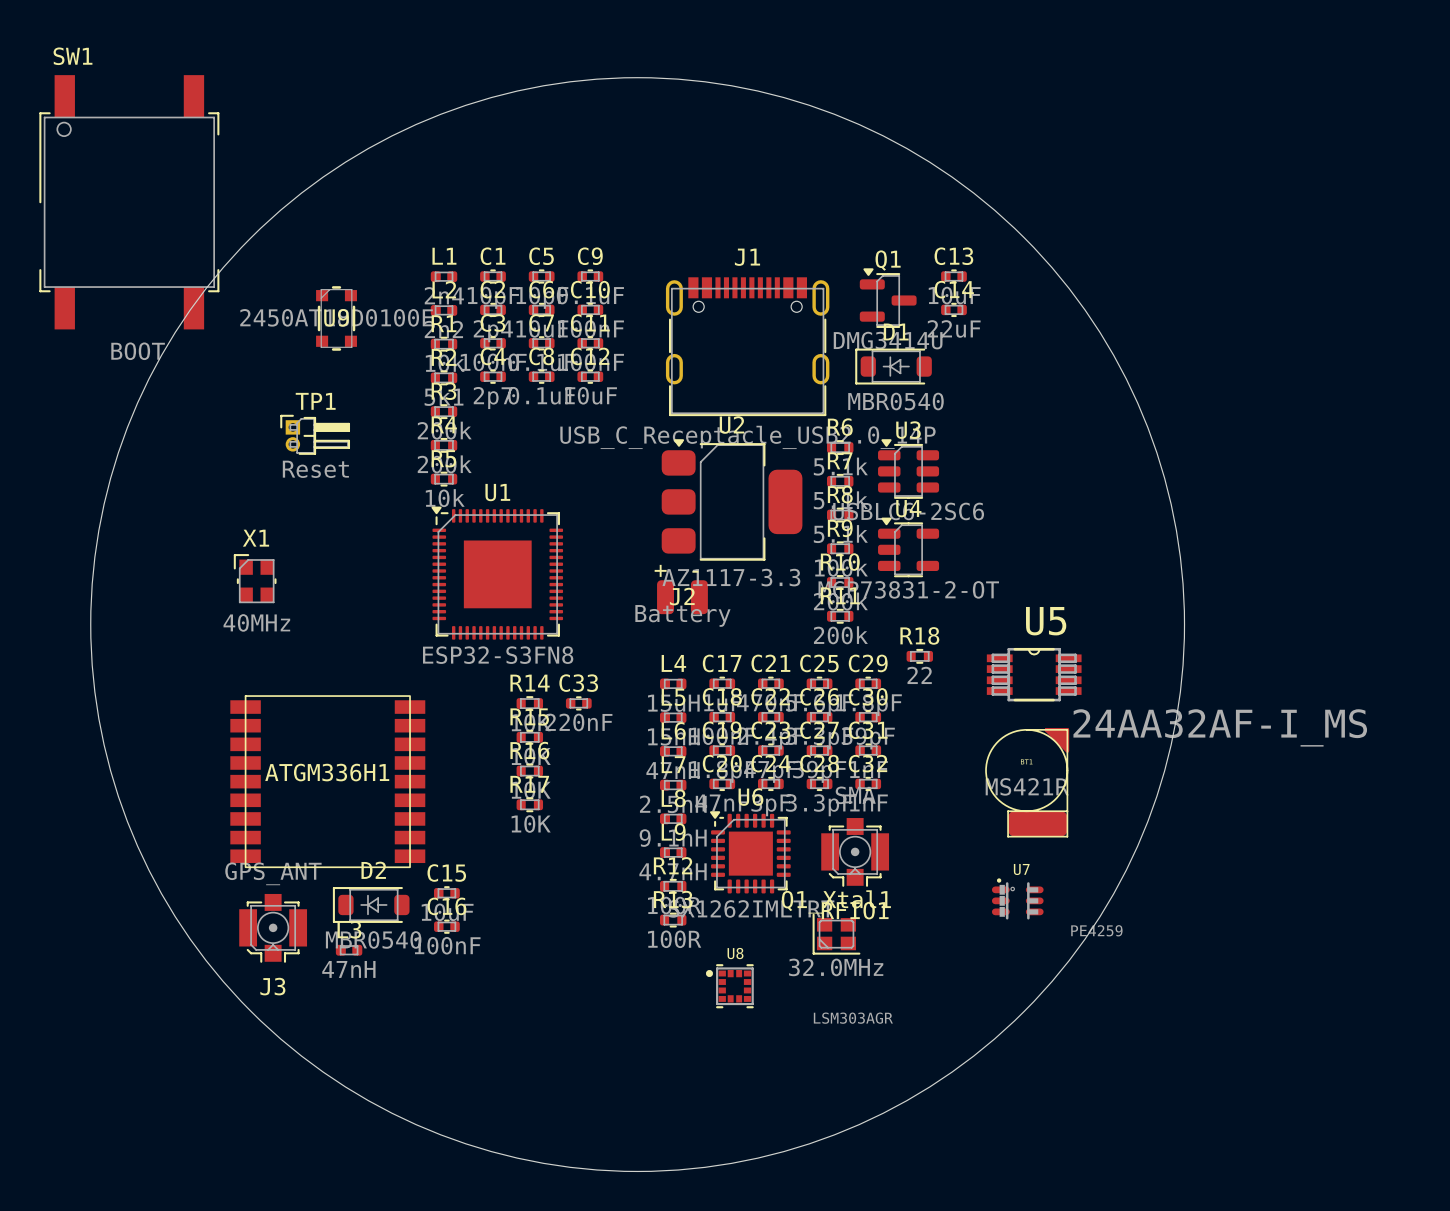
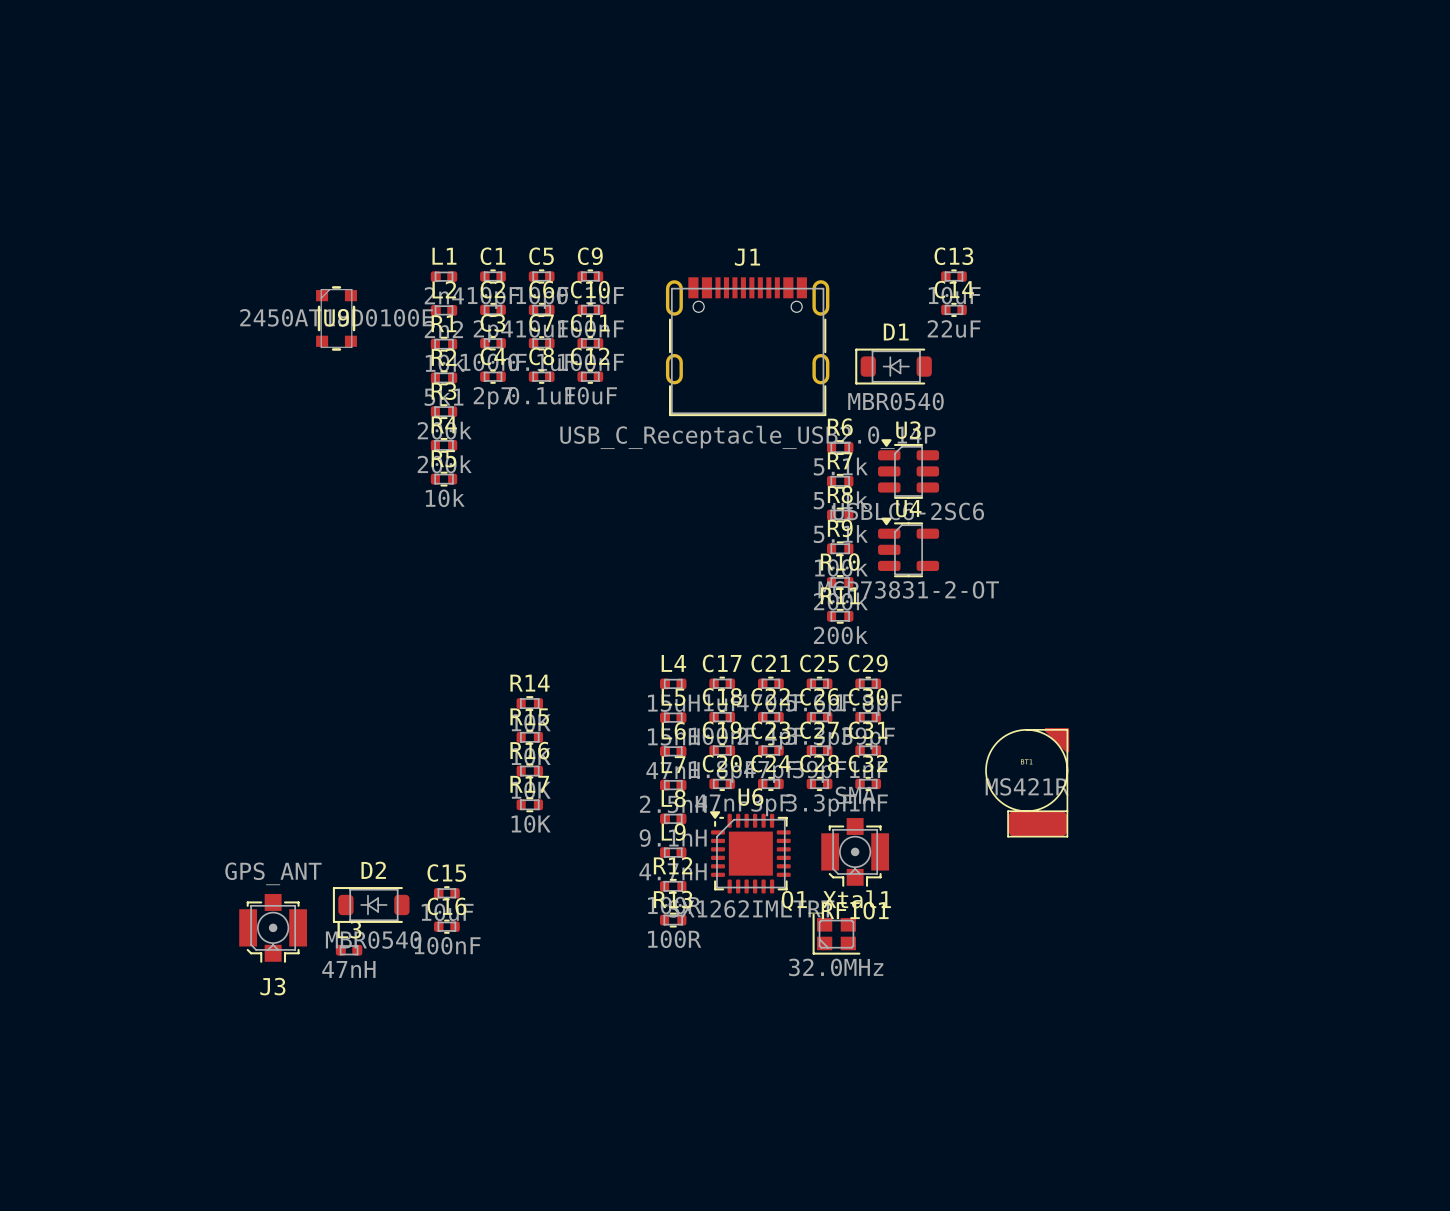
round board edge: [90, 77, 1185, 1172] -> none
SW1: BOOT (129, 202) -> none
Q1: DMG3414U (888, 298) -> none
TP1: Reset (315, 434) -> none
U2: AZ1117-3.3 (732, 499) -> none
U1: ESP32-S3FN8 (497, 573) -> none
X1: 40MHz (255, 578) -> none
J2: Battery (682, 597) -> none
R18: 22 (919, 656) -> none
U5: 24AA32AF-I_MS (1034, 674) -> none
C33: 220nF (578, 703) -> none
ATGM336H1: (327, 781) -> none
U7: PE4259 (1017, 898) -> none
U8: LSM303AGR (729, 986) -> none

